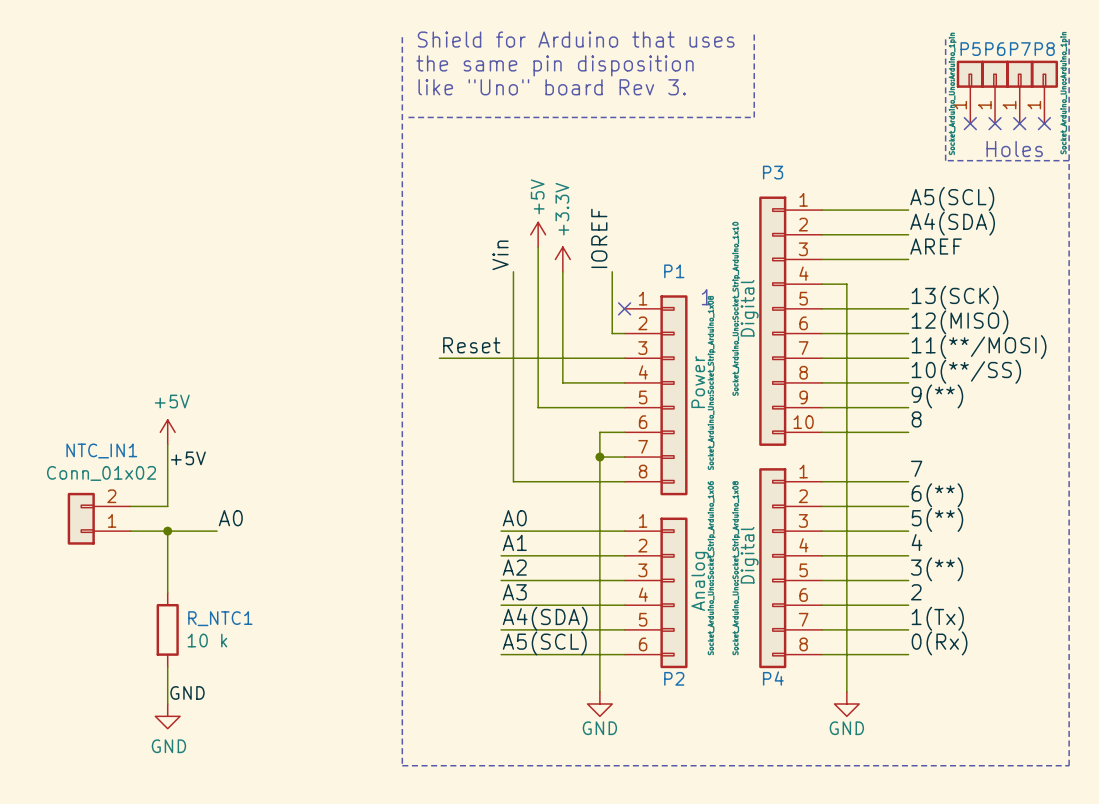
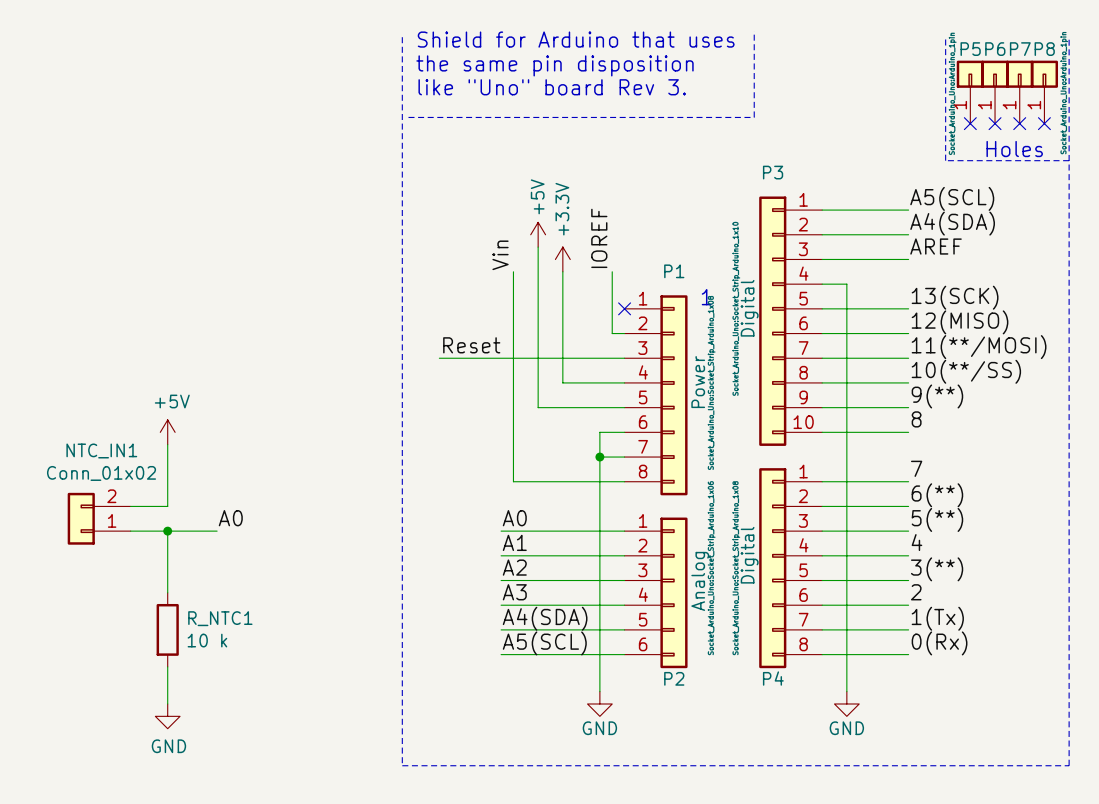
label: +5V (188, 458) -> none
label: GND (187, 692) -> none

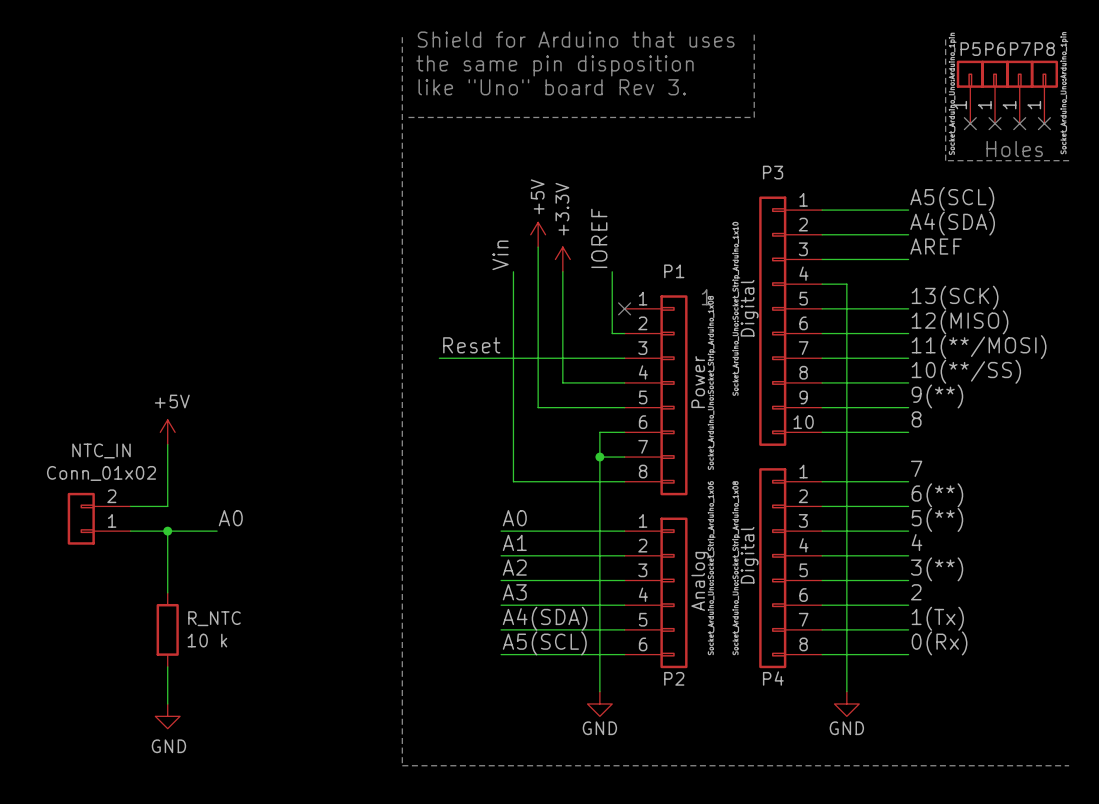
line: (1069, 37) (1069, 765) -> none
NTC_IN1 name: NTC_IN1 (101, 450) -> NTC_IN (101, 450)
R_NTC1 name: R_NTC1 (220, 618) -> R_NTC (214, 618)

